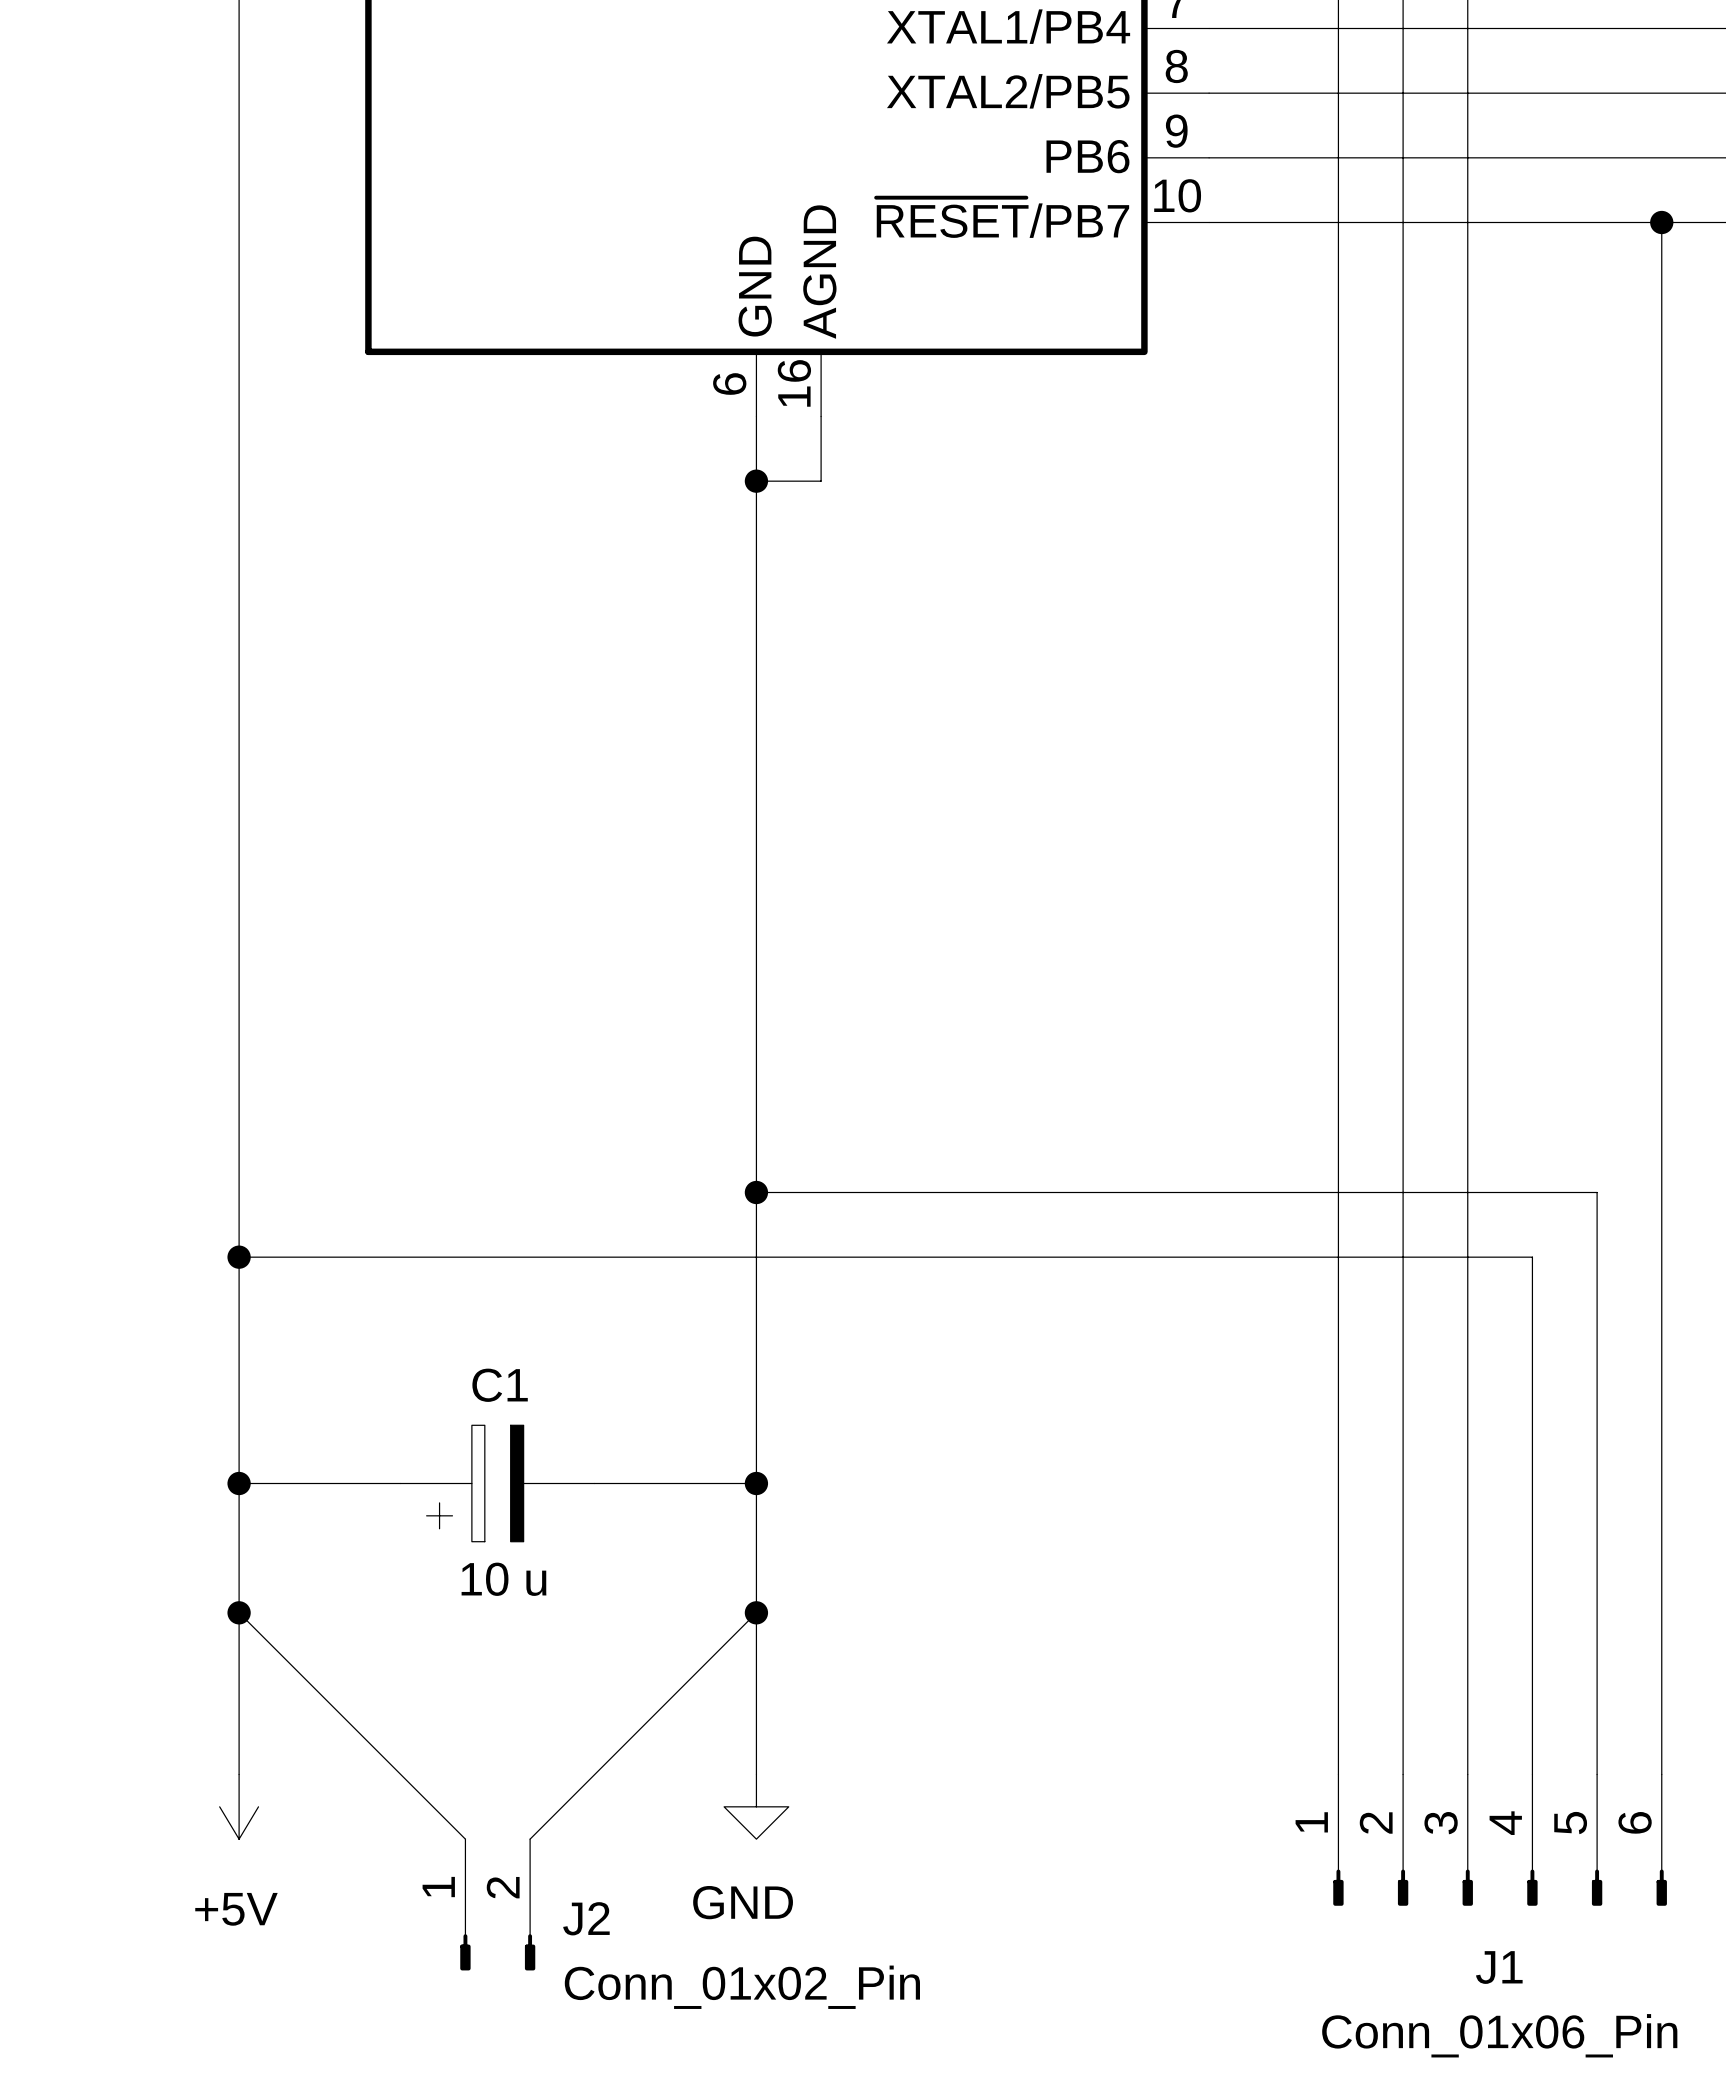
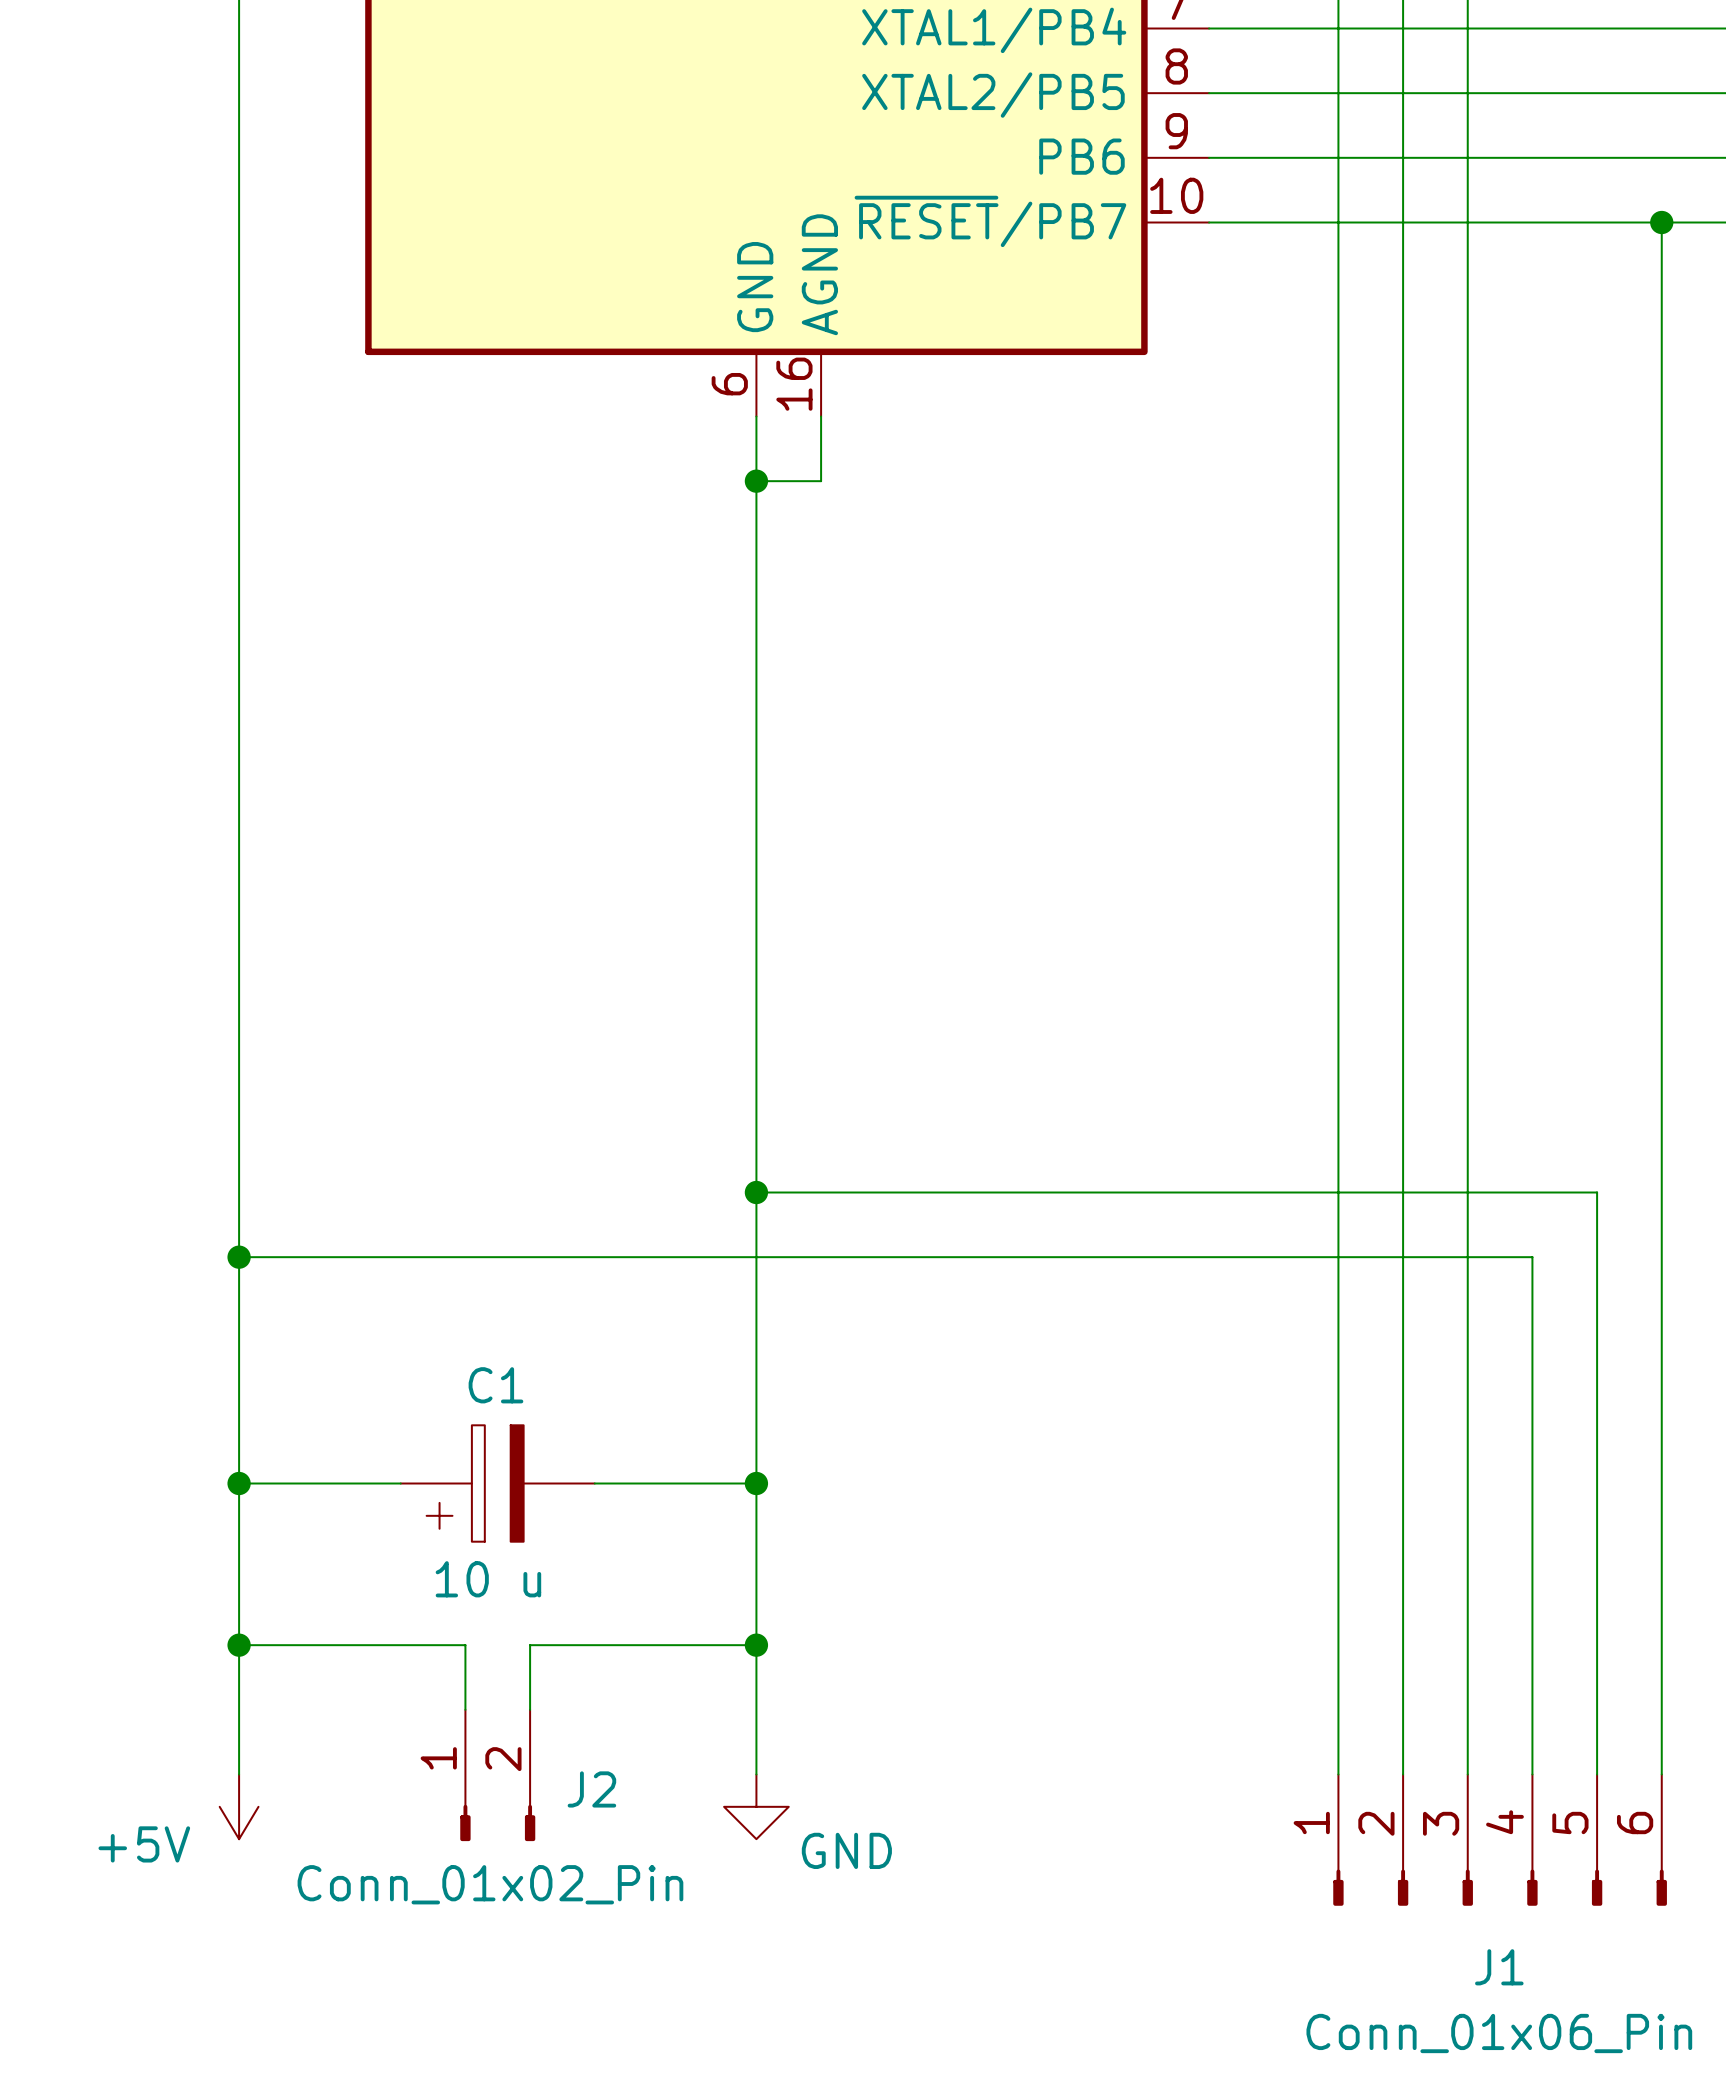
wire: (239, 1612) (465, 1839) -> none
junction position: (239, 1612) -> (239, 1645)
wire: (756, 1612) (530, 1839) -> none
junction position: (756, 1612) -> (756, 1645)
wire: none -> (239, 1645) (465, 1645) (465, 1709)
wire: none -> (756, 1645) (530, 1645) (530, 1709)
power symbol text position: GND (743, 1902) -> GND (846, 1850)
J2 position: (497, 1904) -> (497, 1775)
power symbol text position: +5V (236, 1909) -> +5V (144, 1844)
J2 value position: Conn_01x02_Pin (742, 1987) -> Conn_01x02_Pin (490, 1884)

